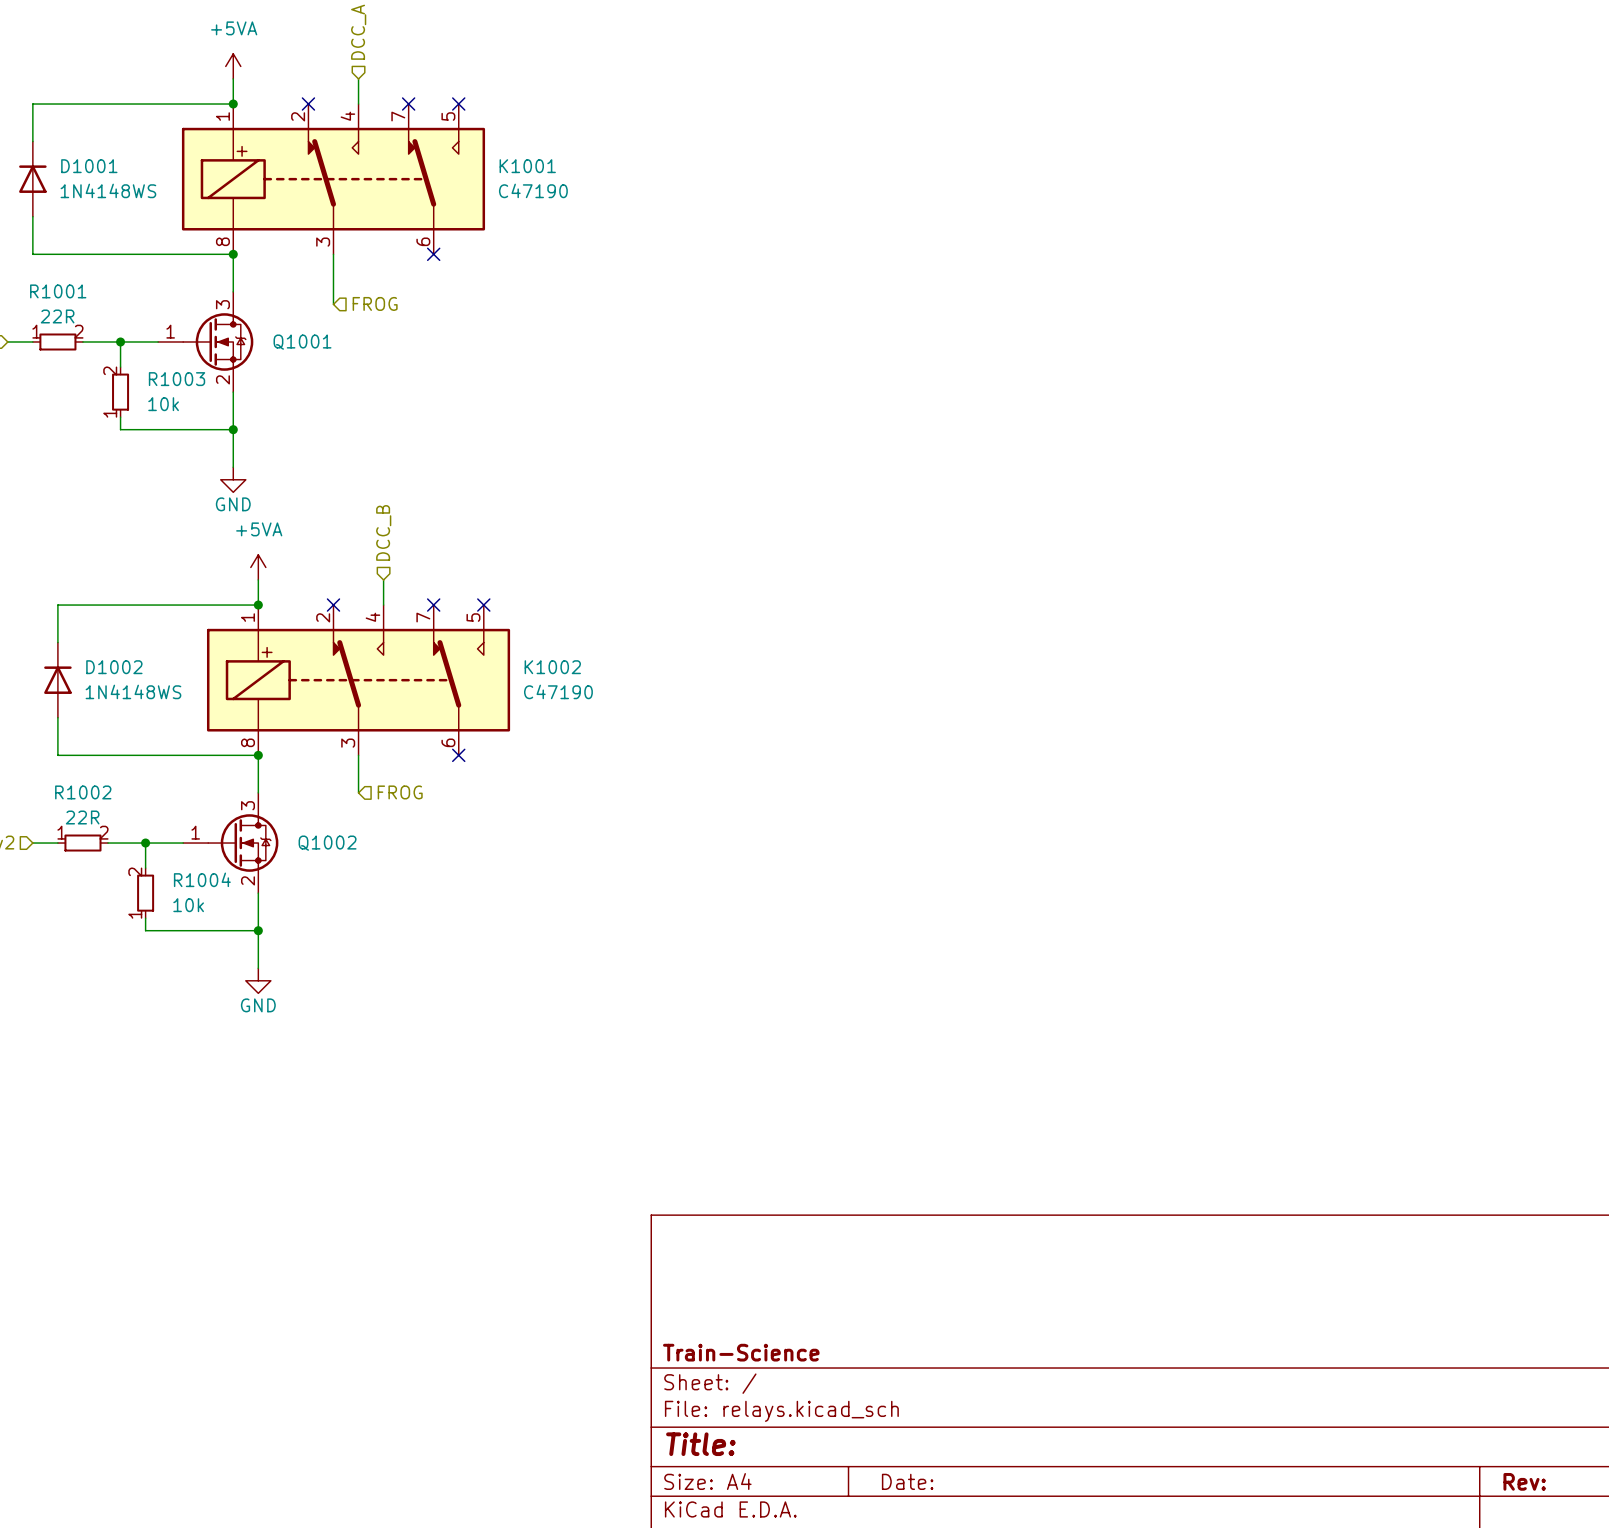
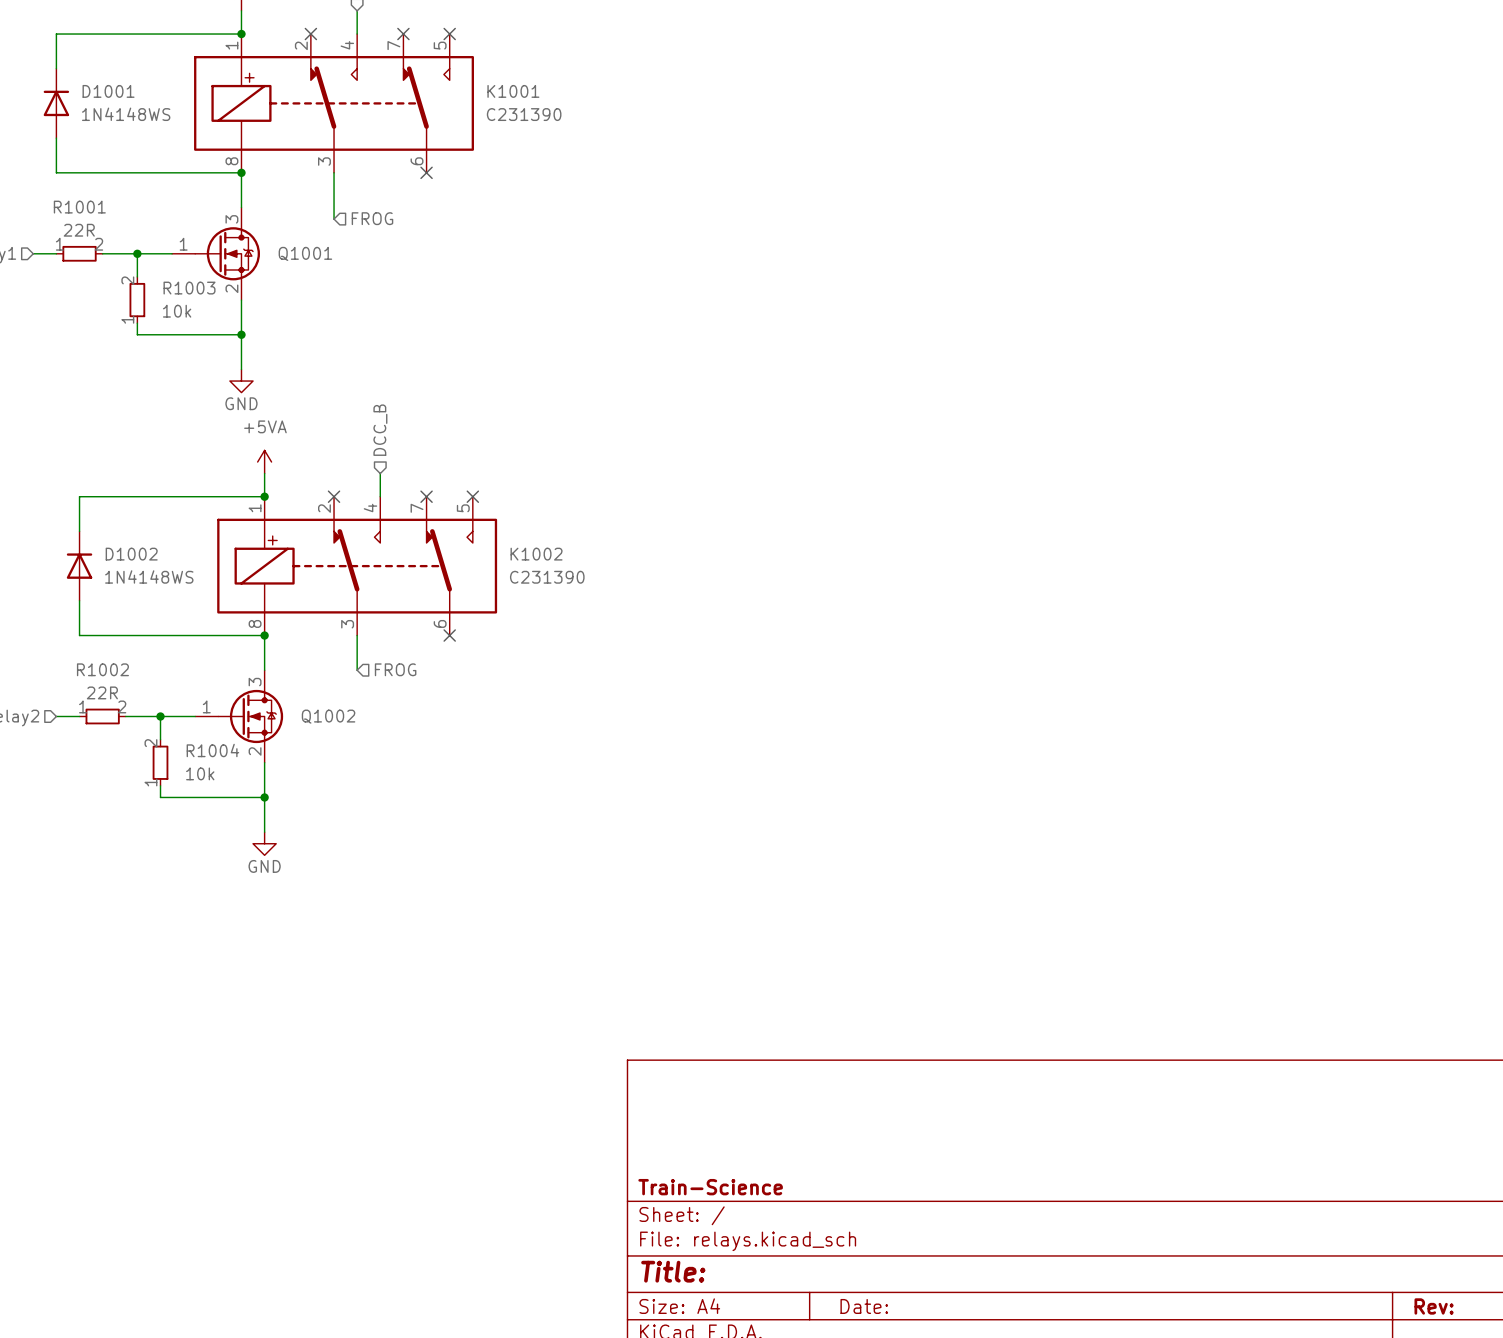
K1001 text: C47190 (533, 190) -> C231390 (524, 114)
K1002 text: C47190 (558, 691) -> C231390 (547, 577)

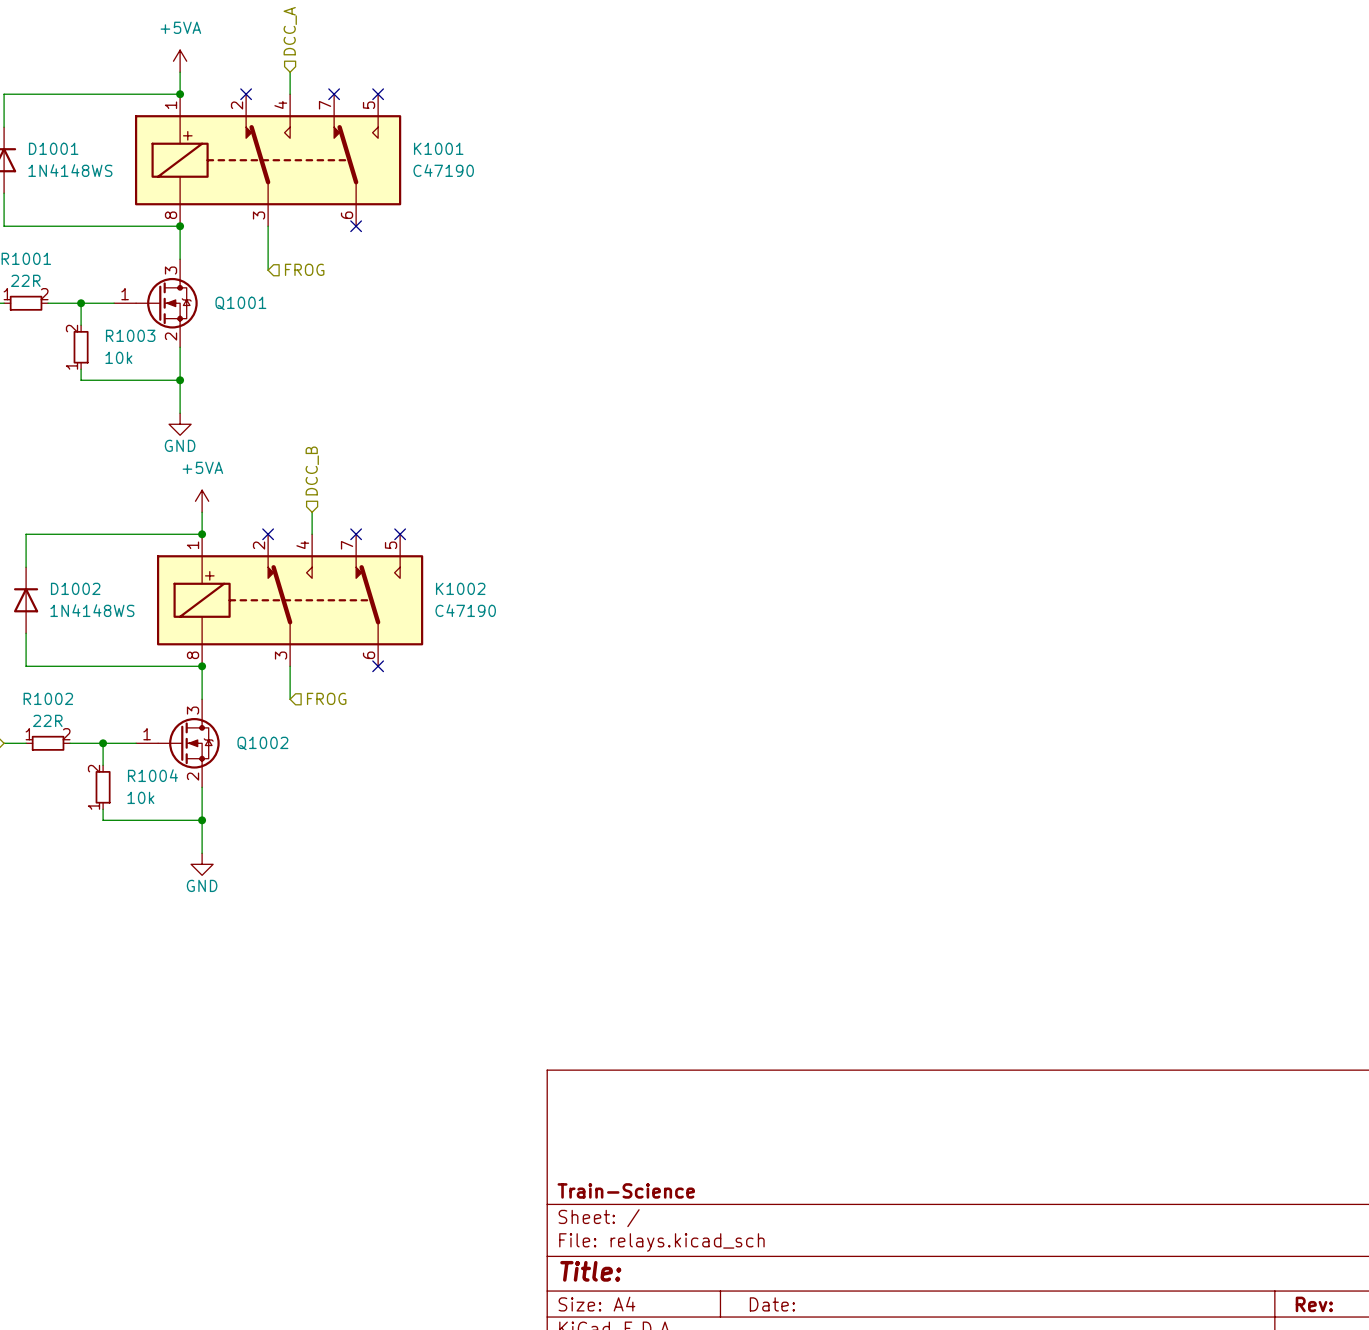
K1001 text: C231390 (524, 114) -> C47190 (443, 170)
K1002 text: C231390 (547, 577) -> C47190 (465, 610)

